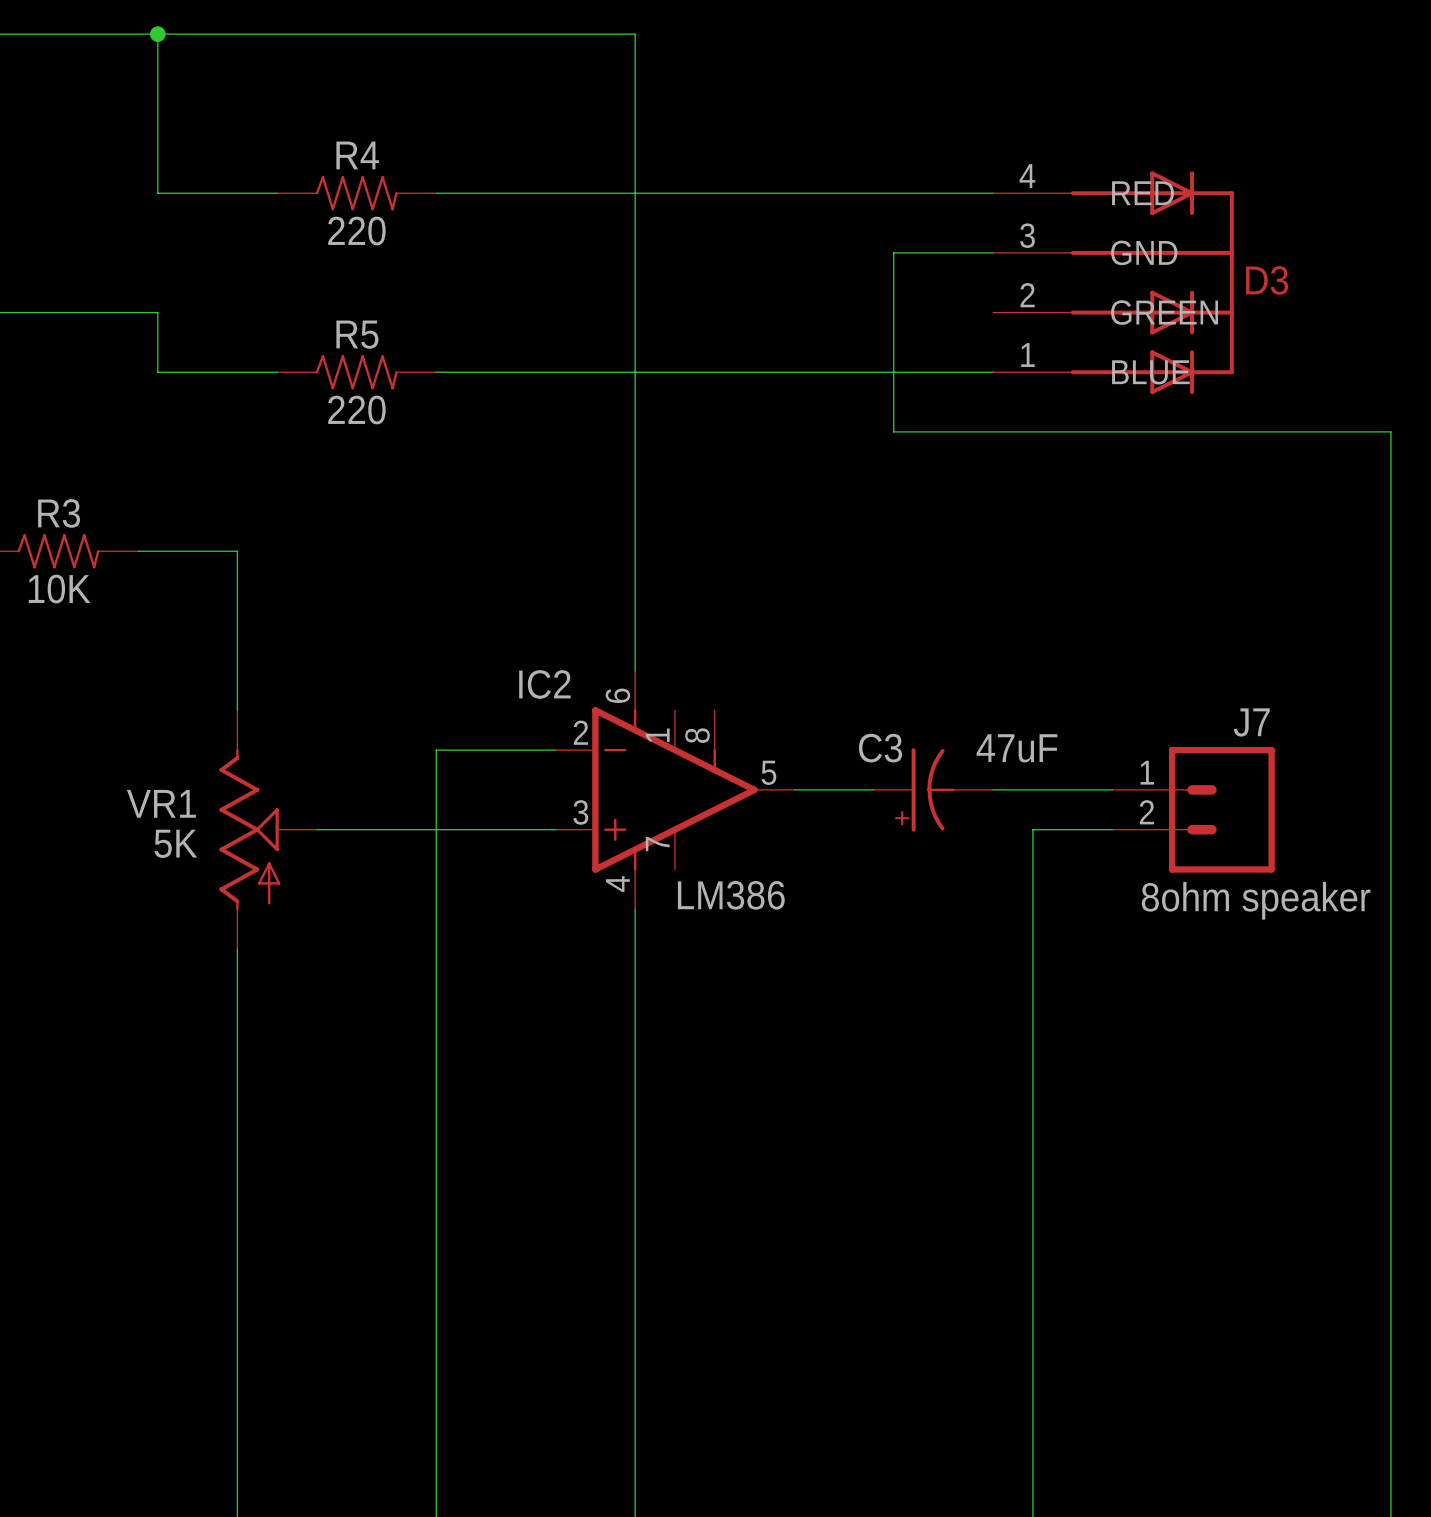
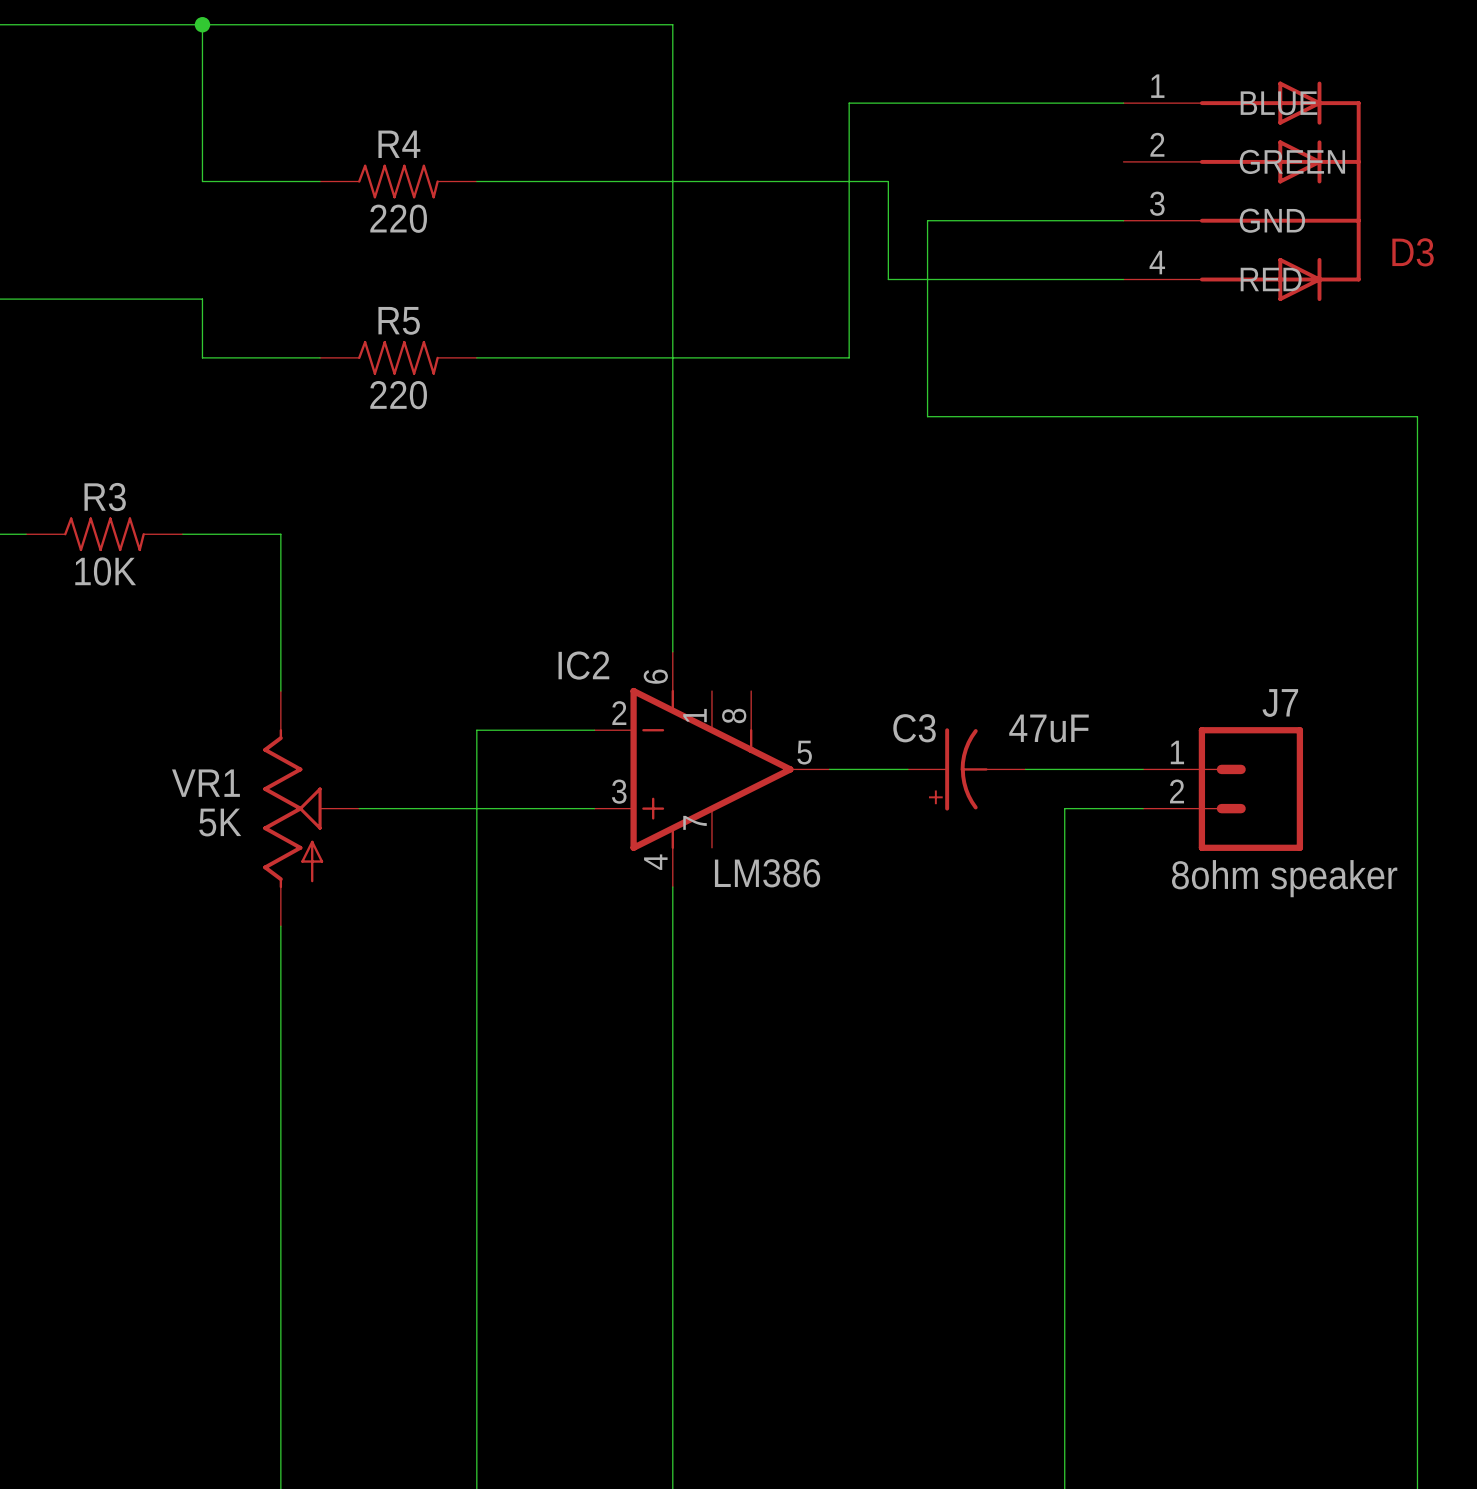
wire: (853, 193) (993, 193) -> (888, 181) (888, 279) (1123, 279)
wire: (893, 252) (993, 252) -> (927, 240) (927, 220) (1123, 220)
D3 name position: D3 (1267, 280) -> D3 (1413, 252)
D3 flip: as is (1152, 282) -> up-down (1280, 191)
wire: (814, 372) (993, 372) -> (849, 357) (849, 103) (1123, 103)

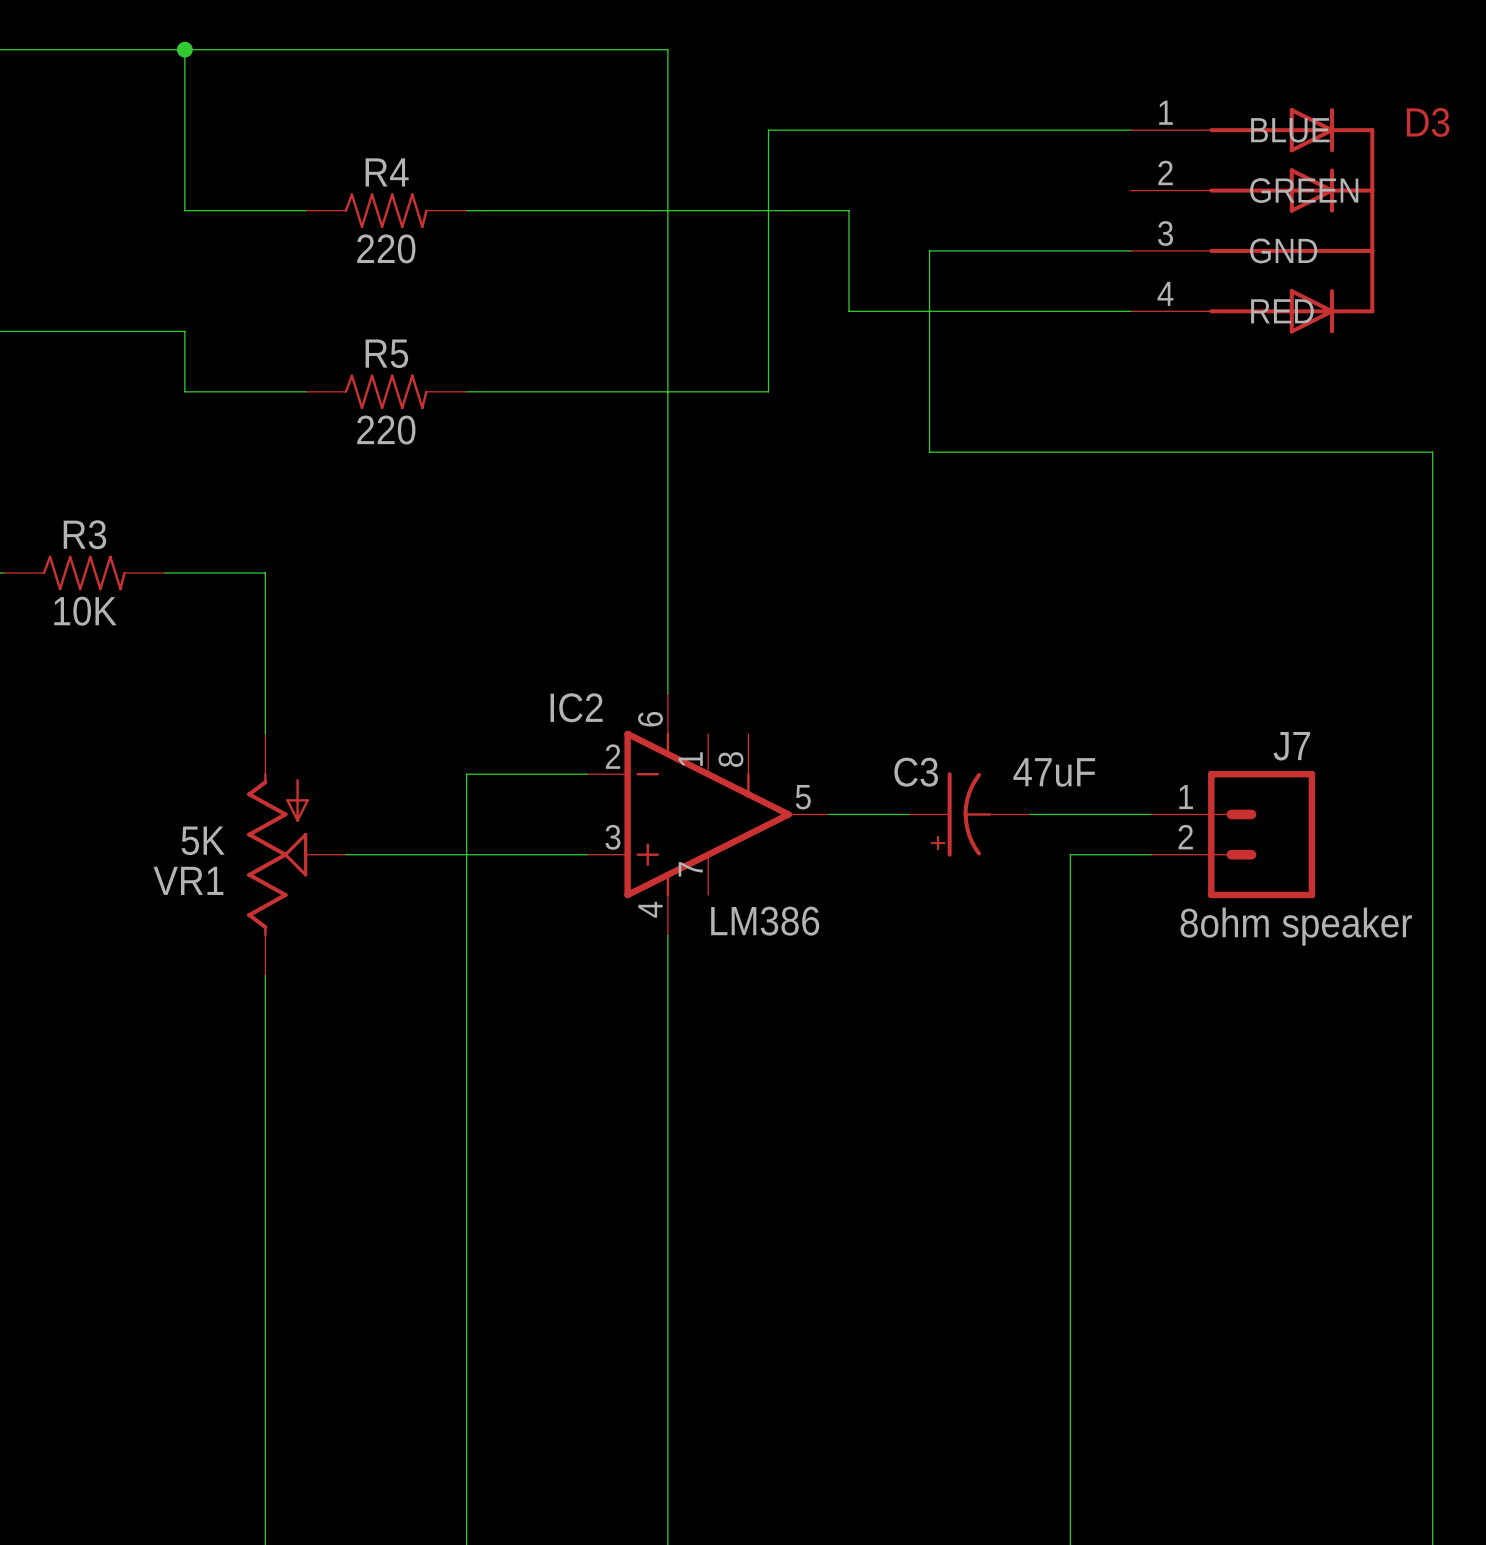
wire: (849, 103) (849, 181) (888, 181) (888, 279) -> (849, 130) (768, 130) (768, 391)
D3 name position: D3 (1413, 252) -> D3 (1428, 122)
wire: (849, 279) (849, 357) (770, 357) -> (849, 311) (889, 311)
VR1 flip: as is (293, 808) -> up-down (278, 854)

